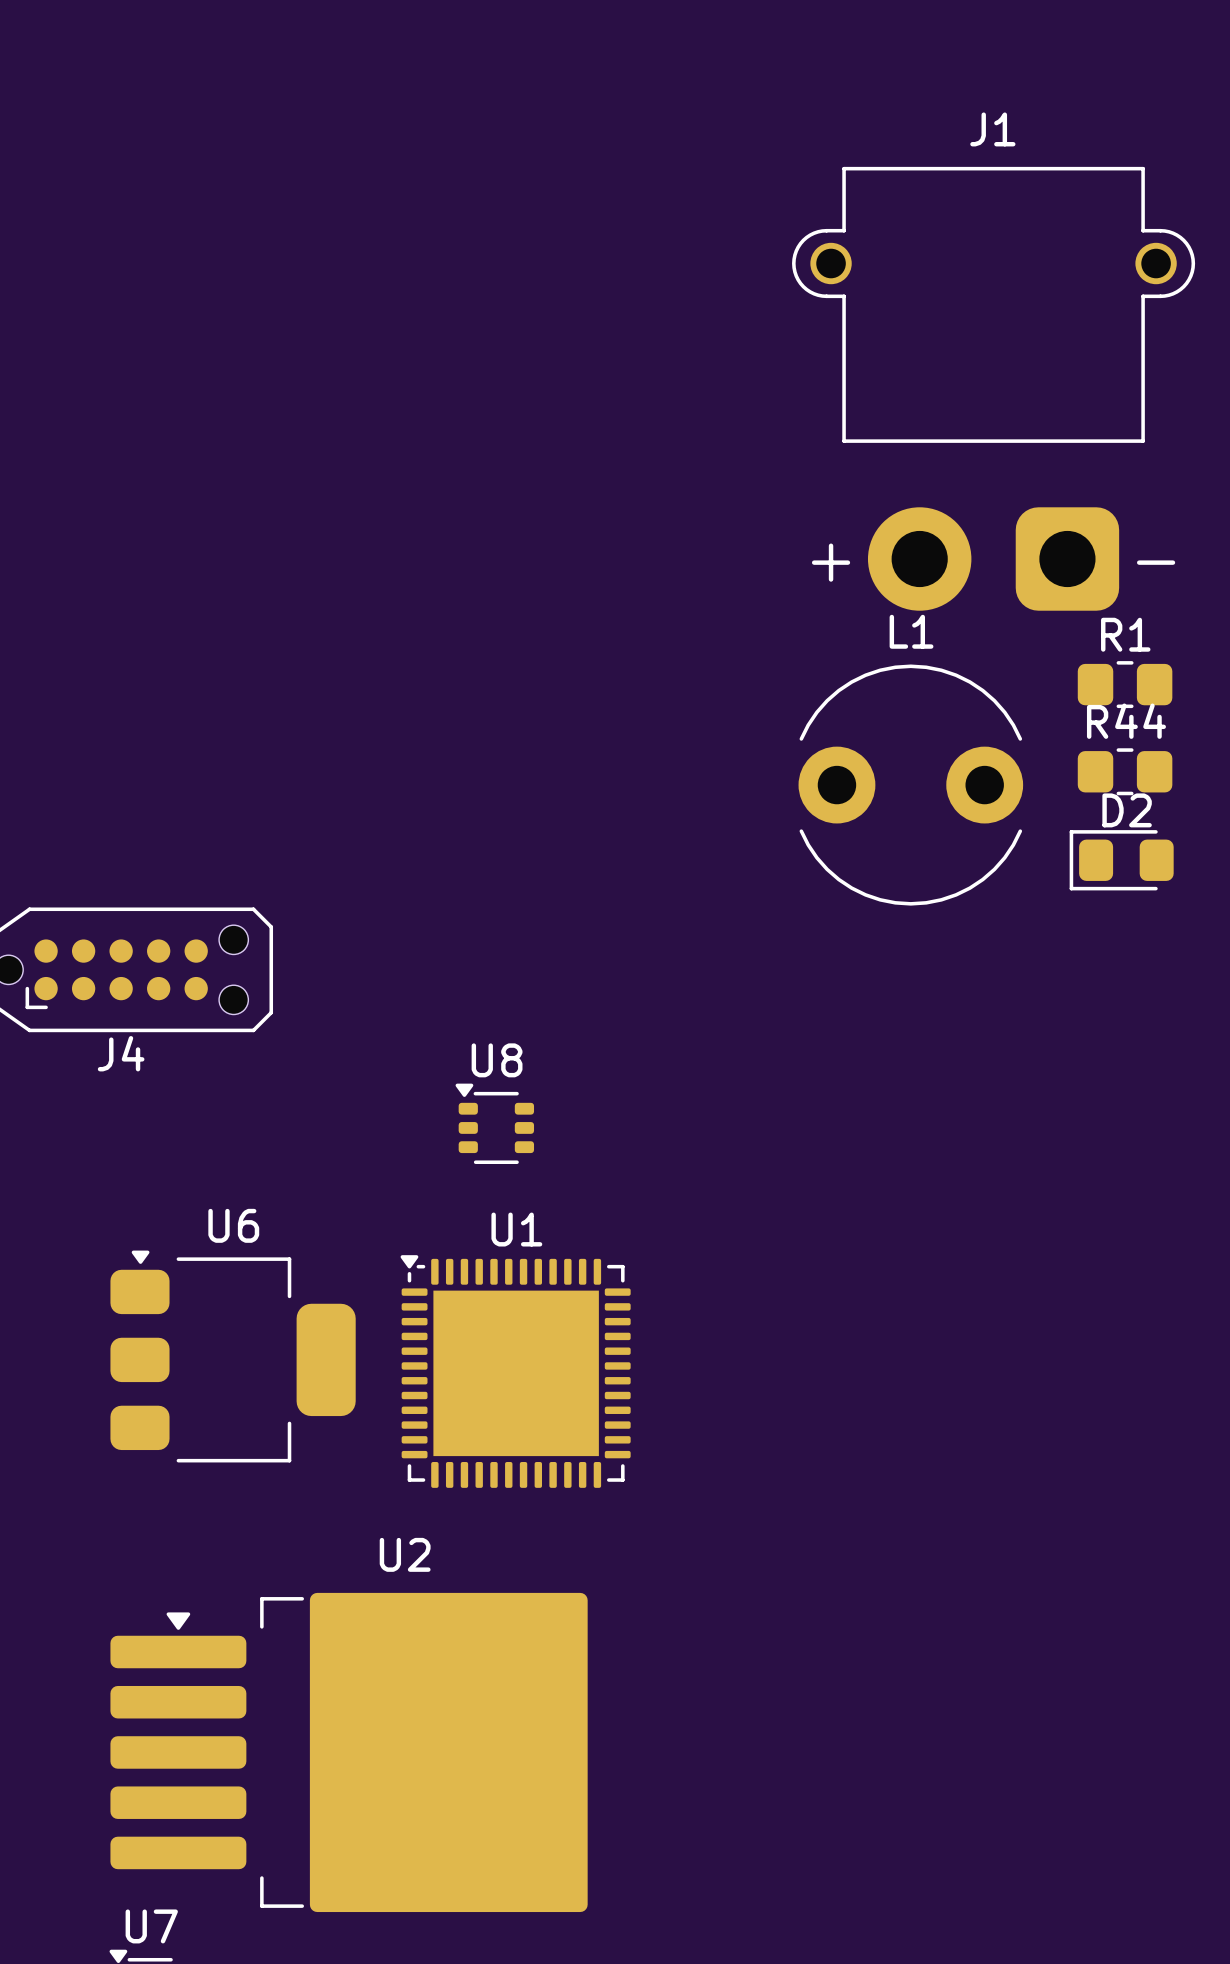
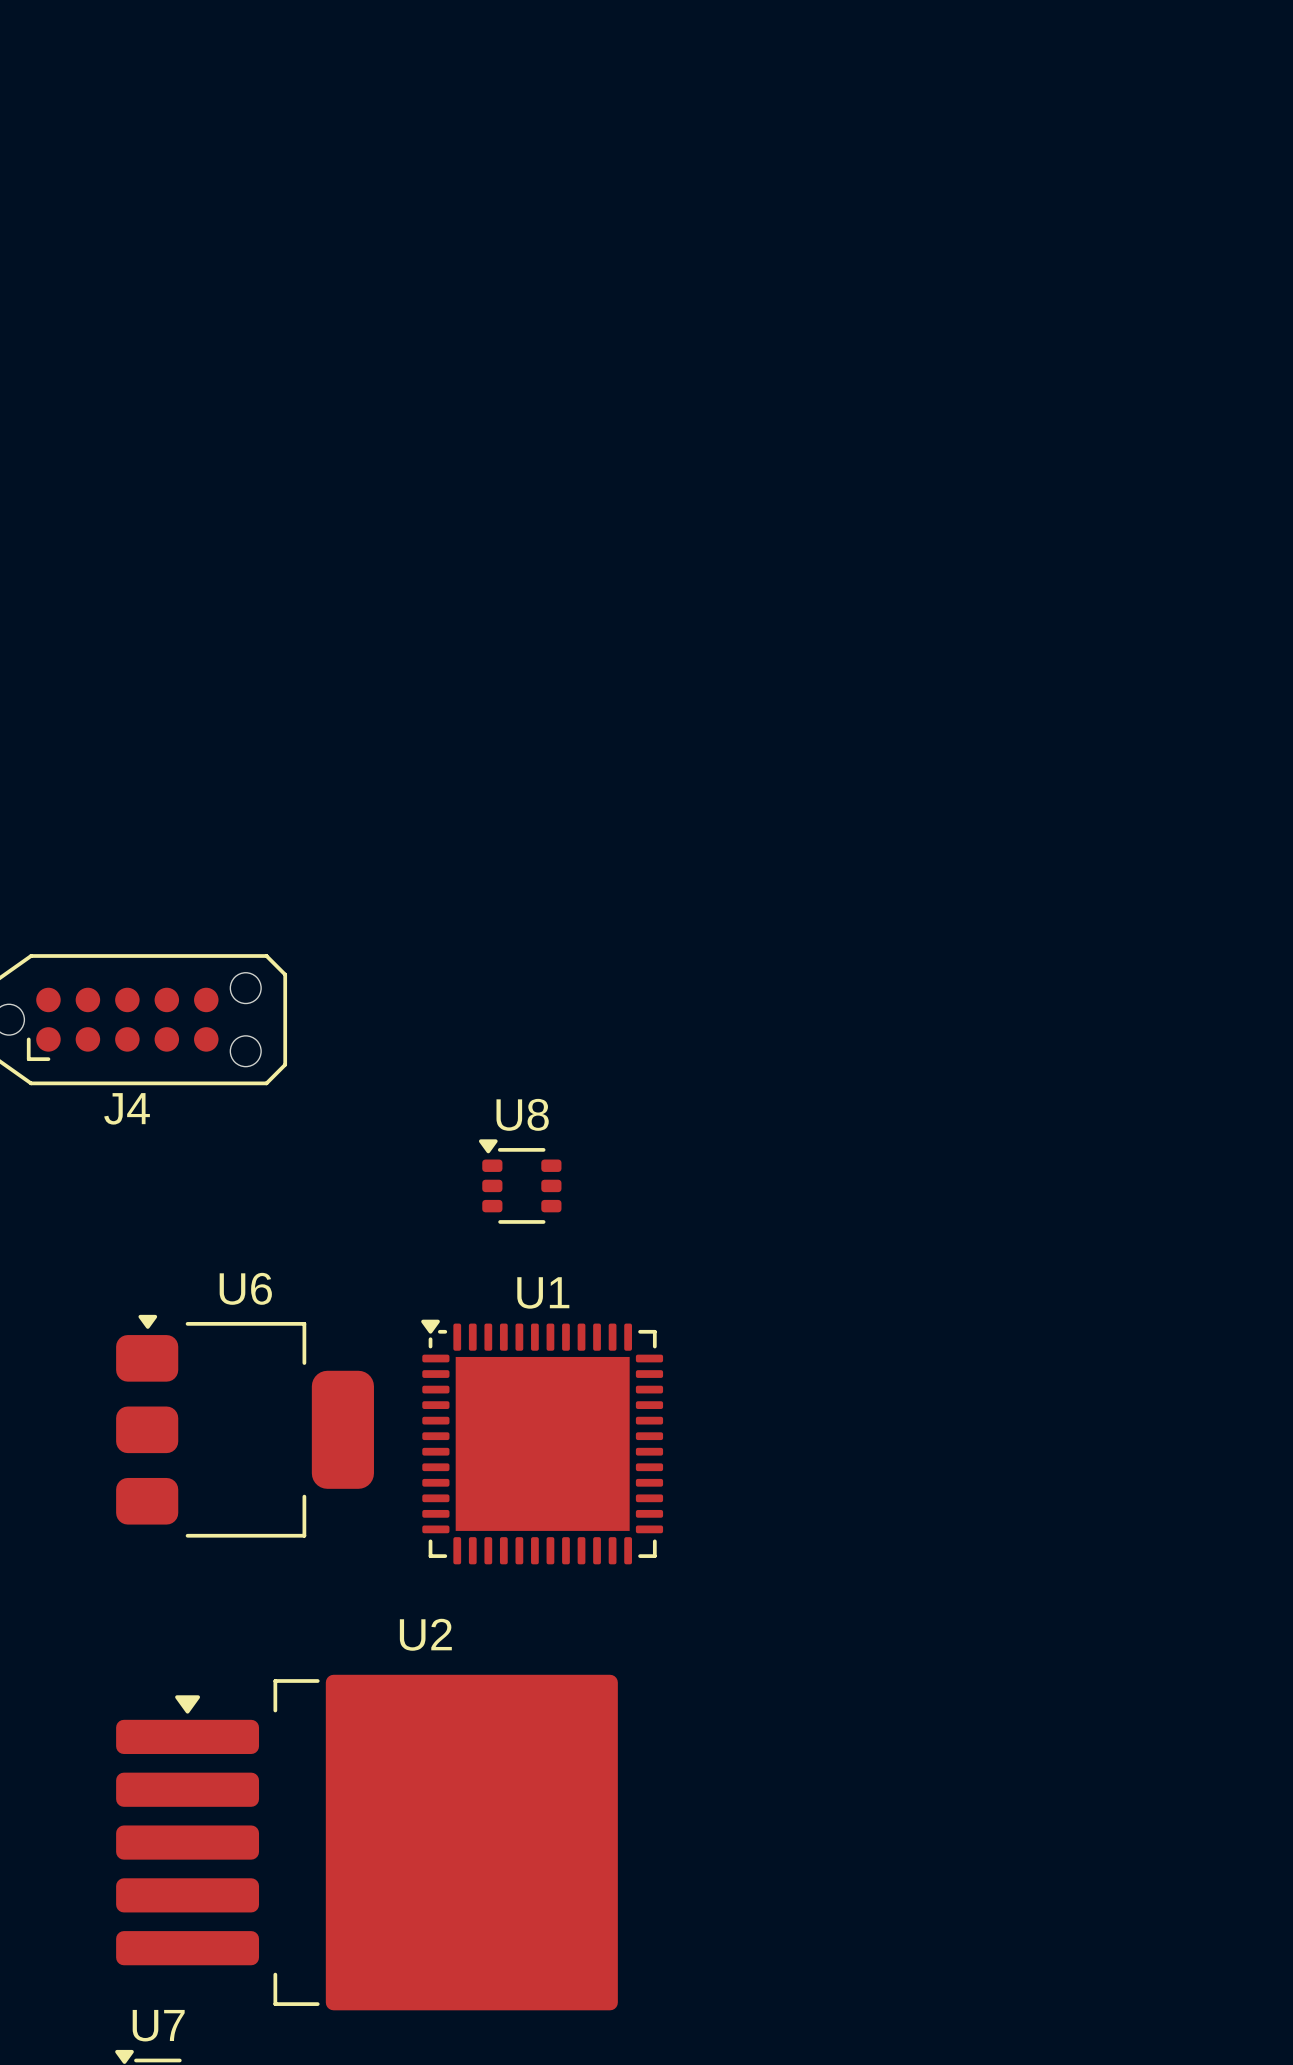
J1: (993, 388) -> none
R1: (1125, 684) -> none
R44: (1125, 771) -> none
L1: (910, 785) -> none
D2: (1121, 860) -> none

